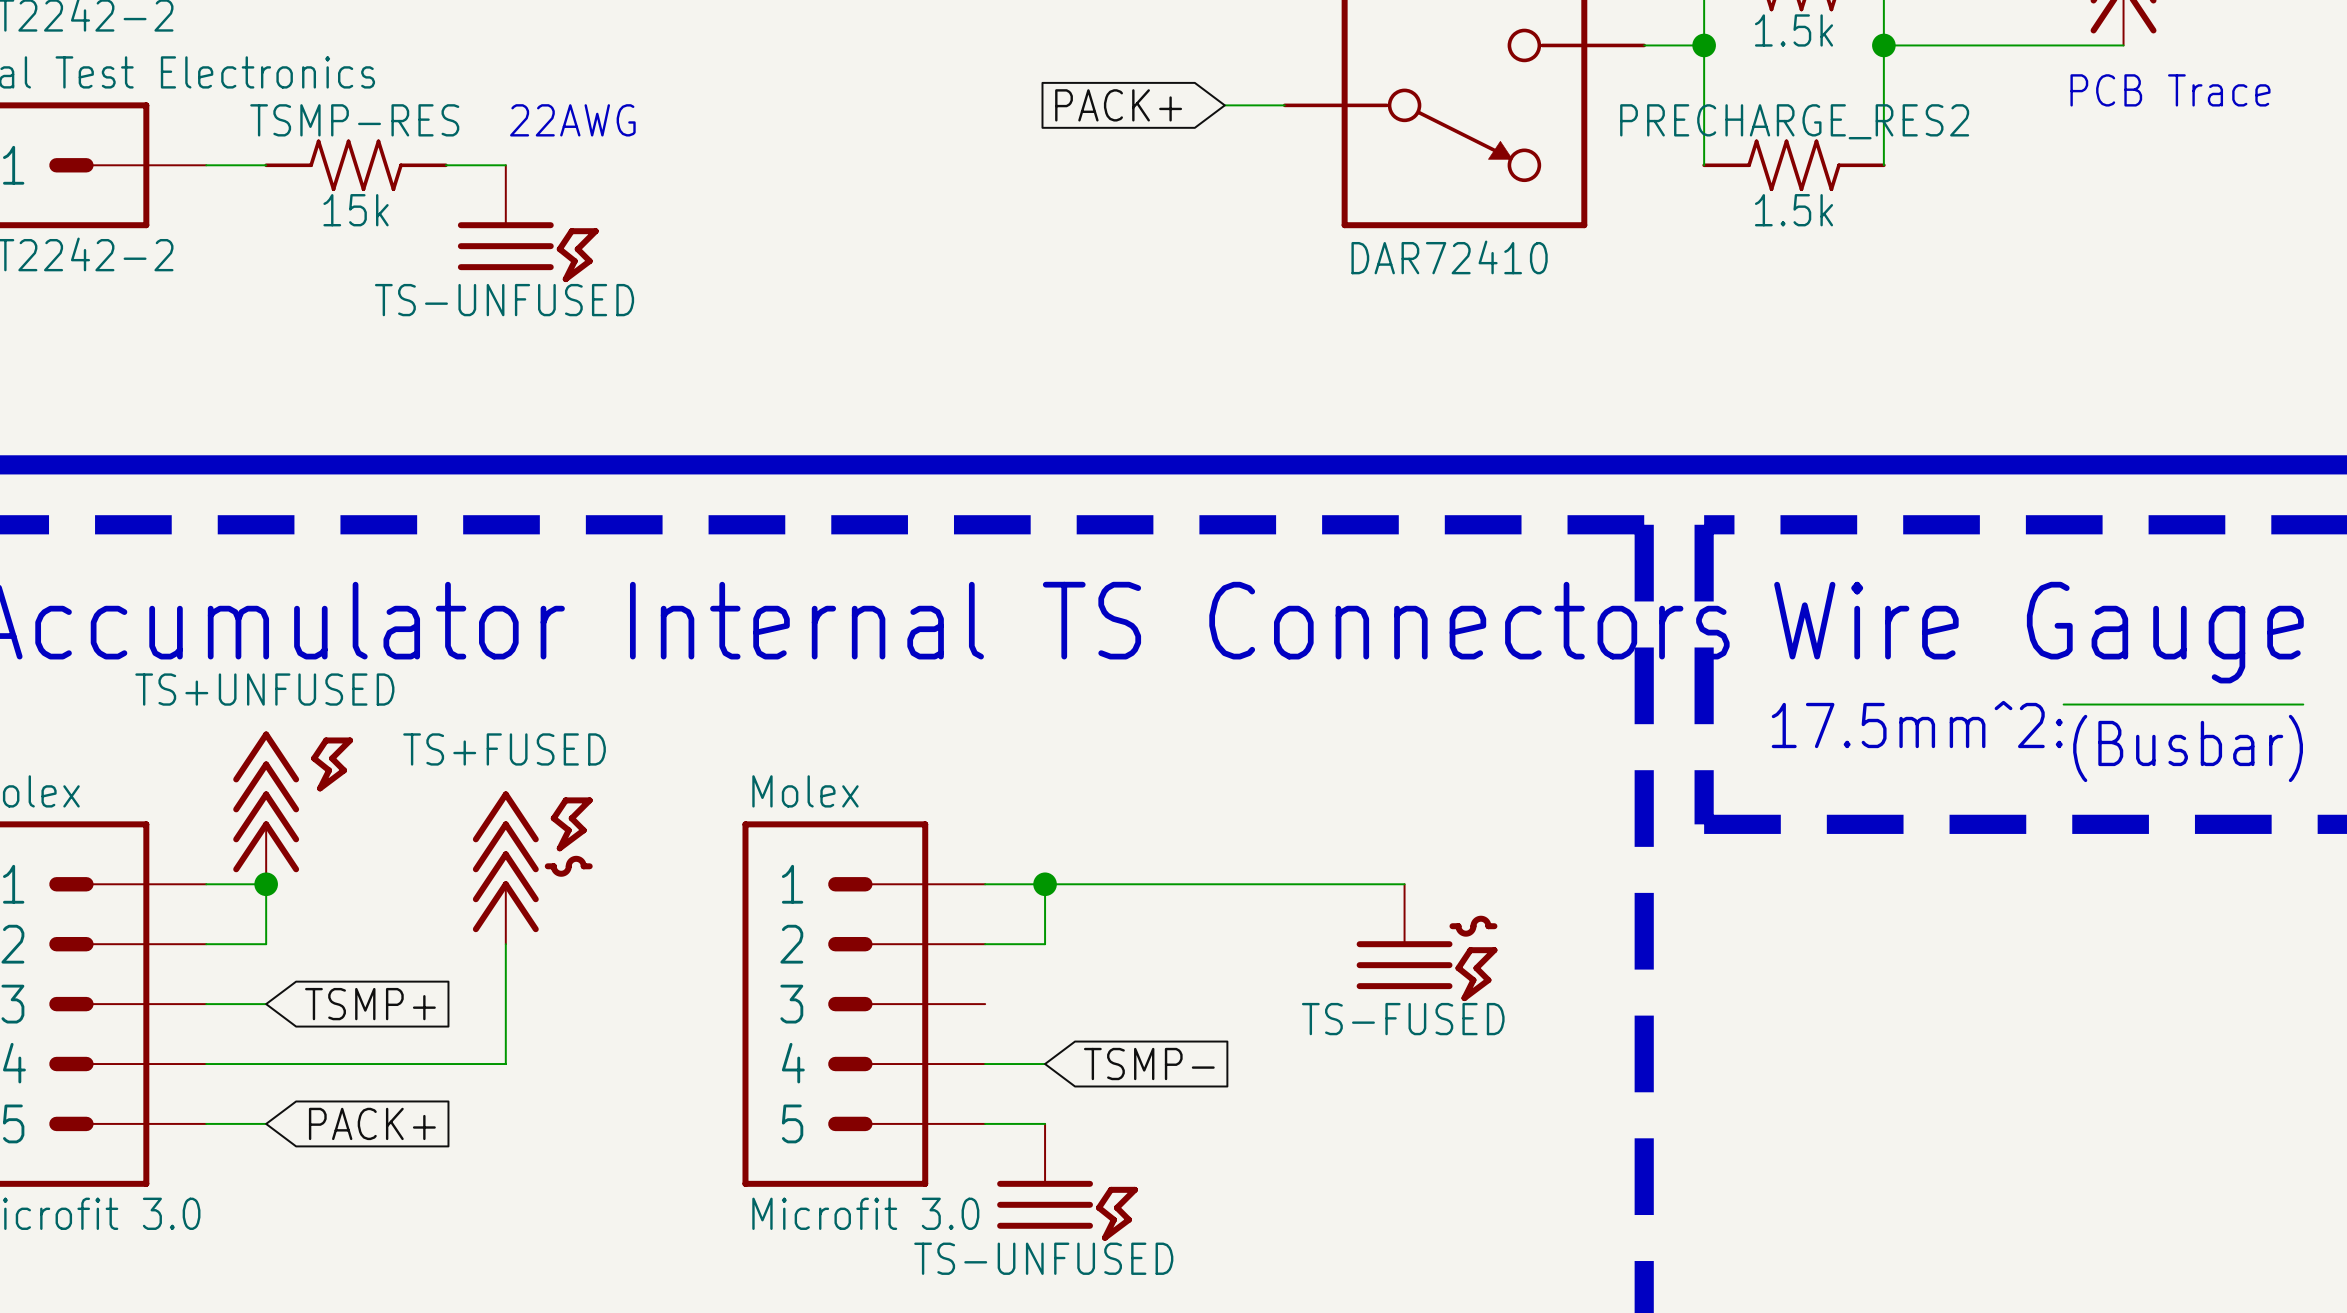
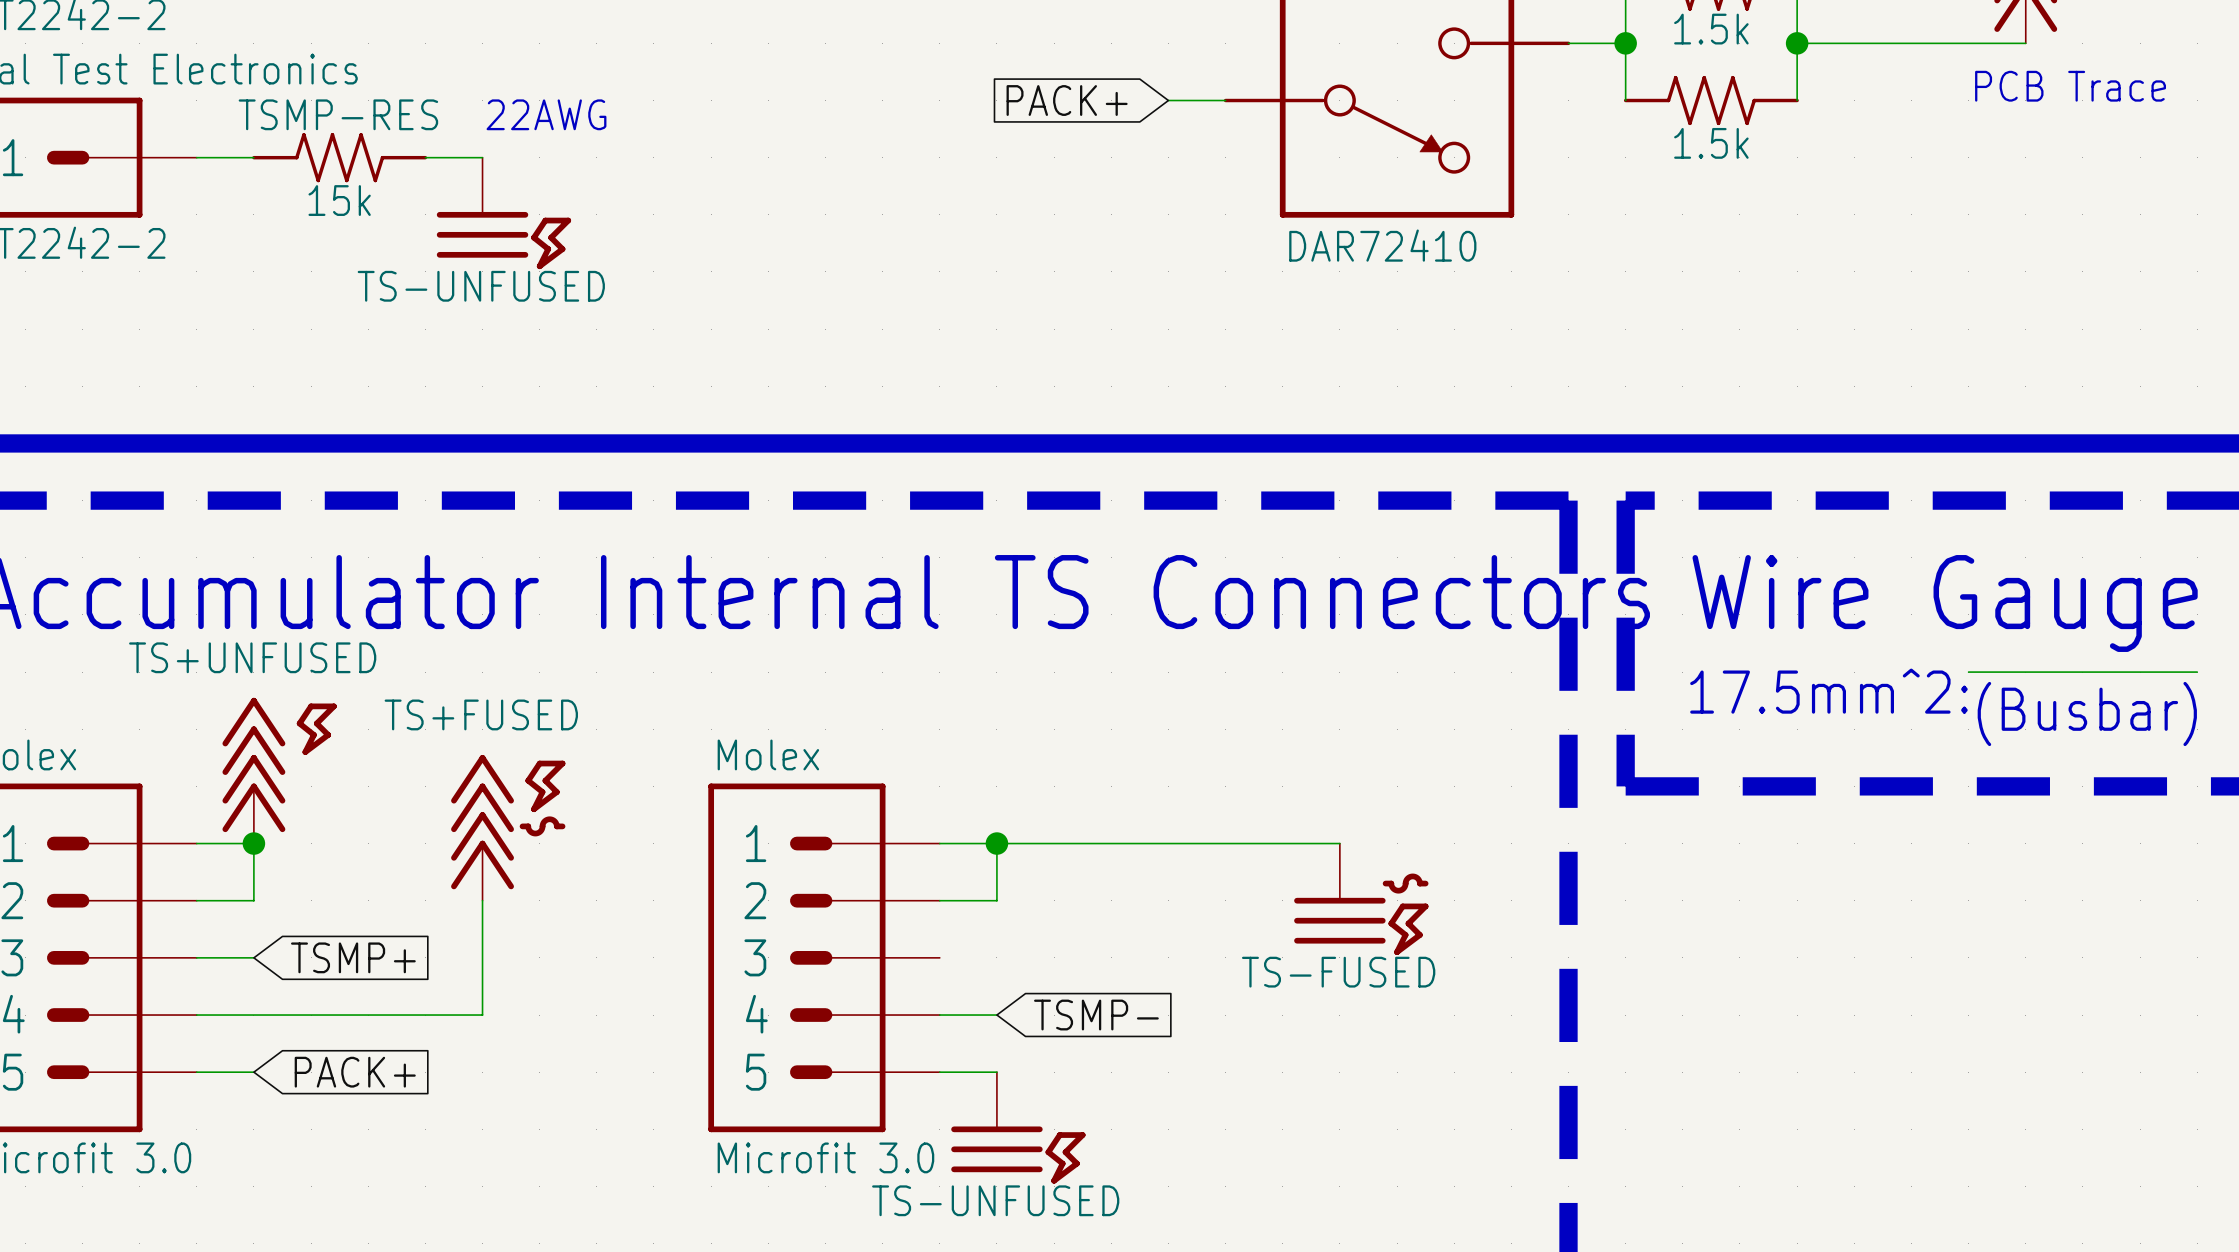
wire: (1704, 105) (1704, 165) -> none
part: none -> 1.5k (1711, 100)
wire: (1883, 105) (1883, 165) -> none
PRECHARGE_RES2: 1.5k (1794, 165) -> none

